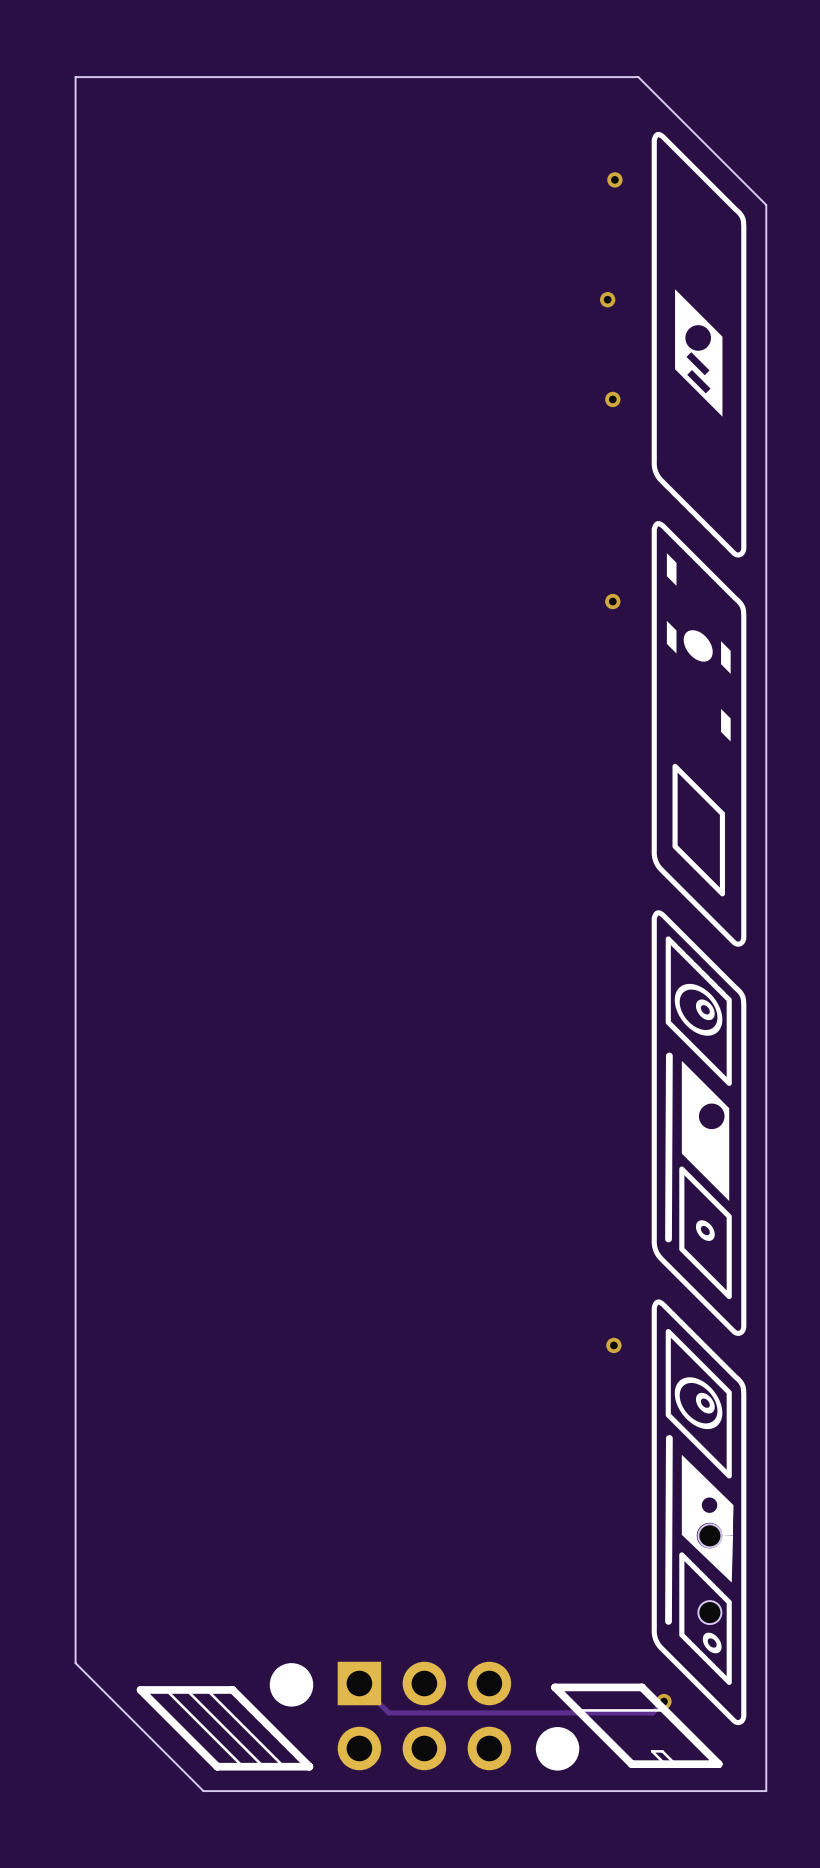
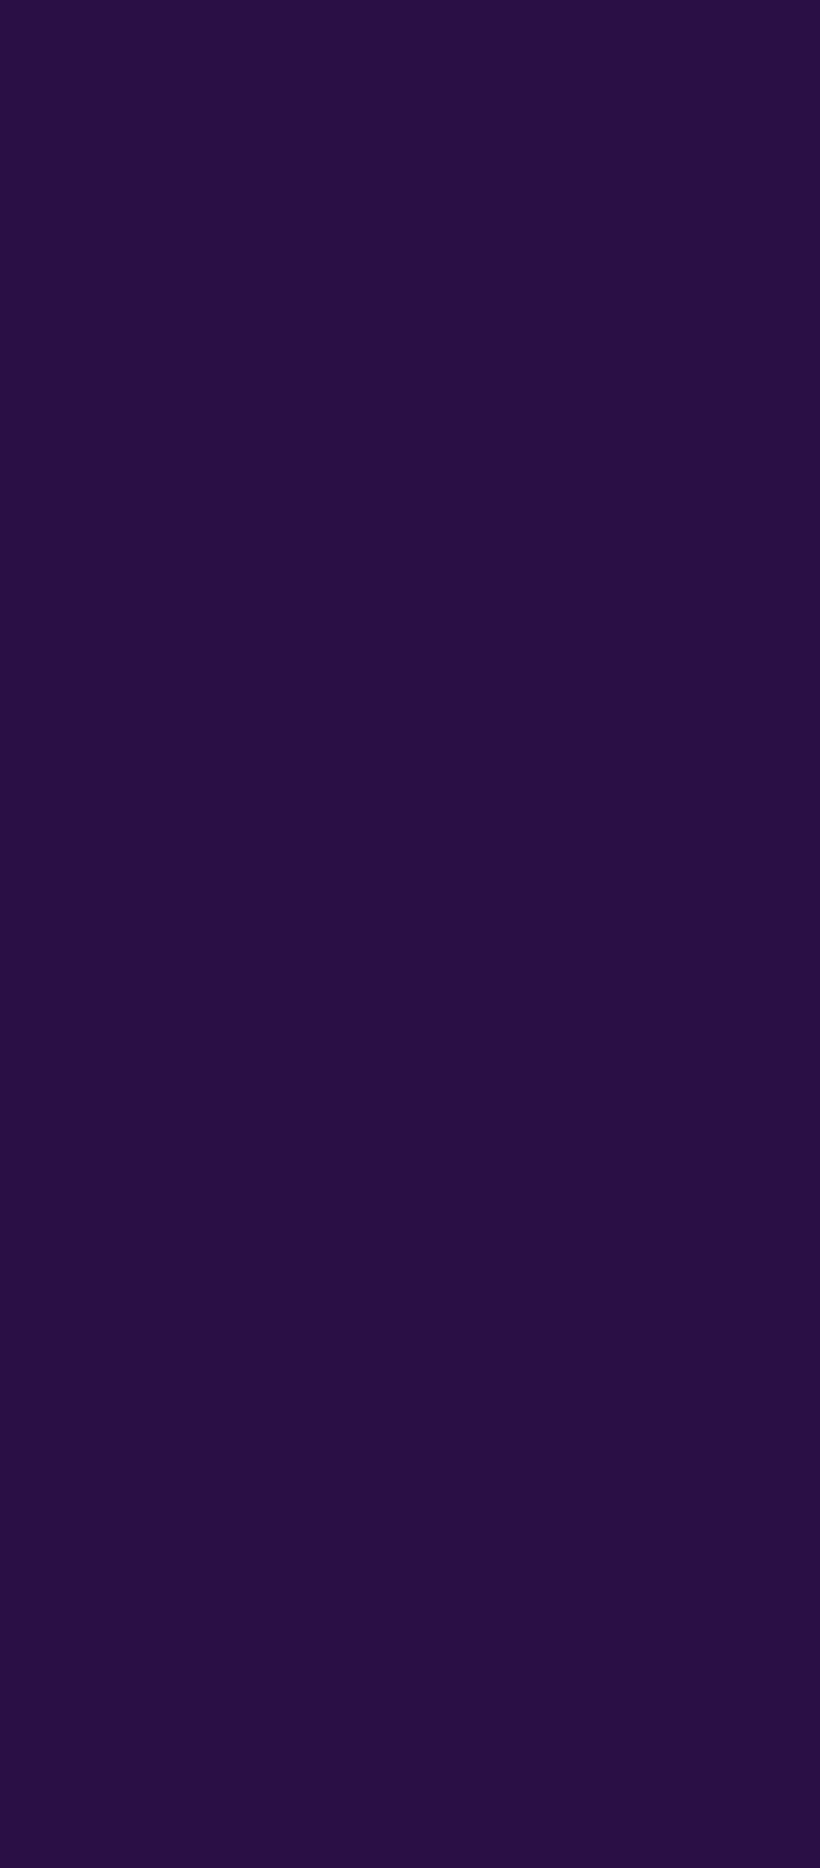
board edge: (75, 77) (75, 1663) (203, 1791) (766, 1791) (766, 205) (638, 77) (75, 77) -> none
drawing: [651, 131, 747, 1726] -> none
via: (614, 179) -> none
via: (607, 299) -> none
via: (612, 399) -> none
via: (612, 601) -> none
via: (613, 1345) -> none
part: (709, 1574) -> none
drawing: [269, 1663, 314, 1707] -> none
track: (359, 1683) (388, 1712) (652, 1712) (663, 1701) -> none
line: (555, 1687) (641, 1687) (718, 1764) (631, 1764) (555, 1687) -> none
line: (140, 1689) (217, 1766) (309, 1766) (232, 1689) (140, 1689) -> none
line: (166, 1689) (242, 1766) -> none
line: (186, 1689) (263, 1766) -> none
line: (207, 1689) (283, 1766) -> none
via: (663, 1701) -> none
line: (580, 1710) (667, 1710) -> none
part: (424, 1715) -> none
drawing: [535, 1727, 580, 1771] -> none
line: (662, 1761) (652, 1751) (662, 1751) (675, 1764) -> none

